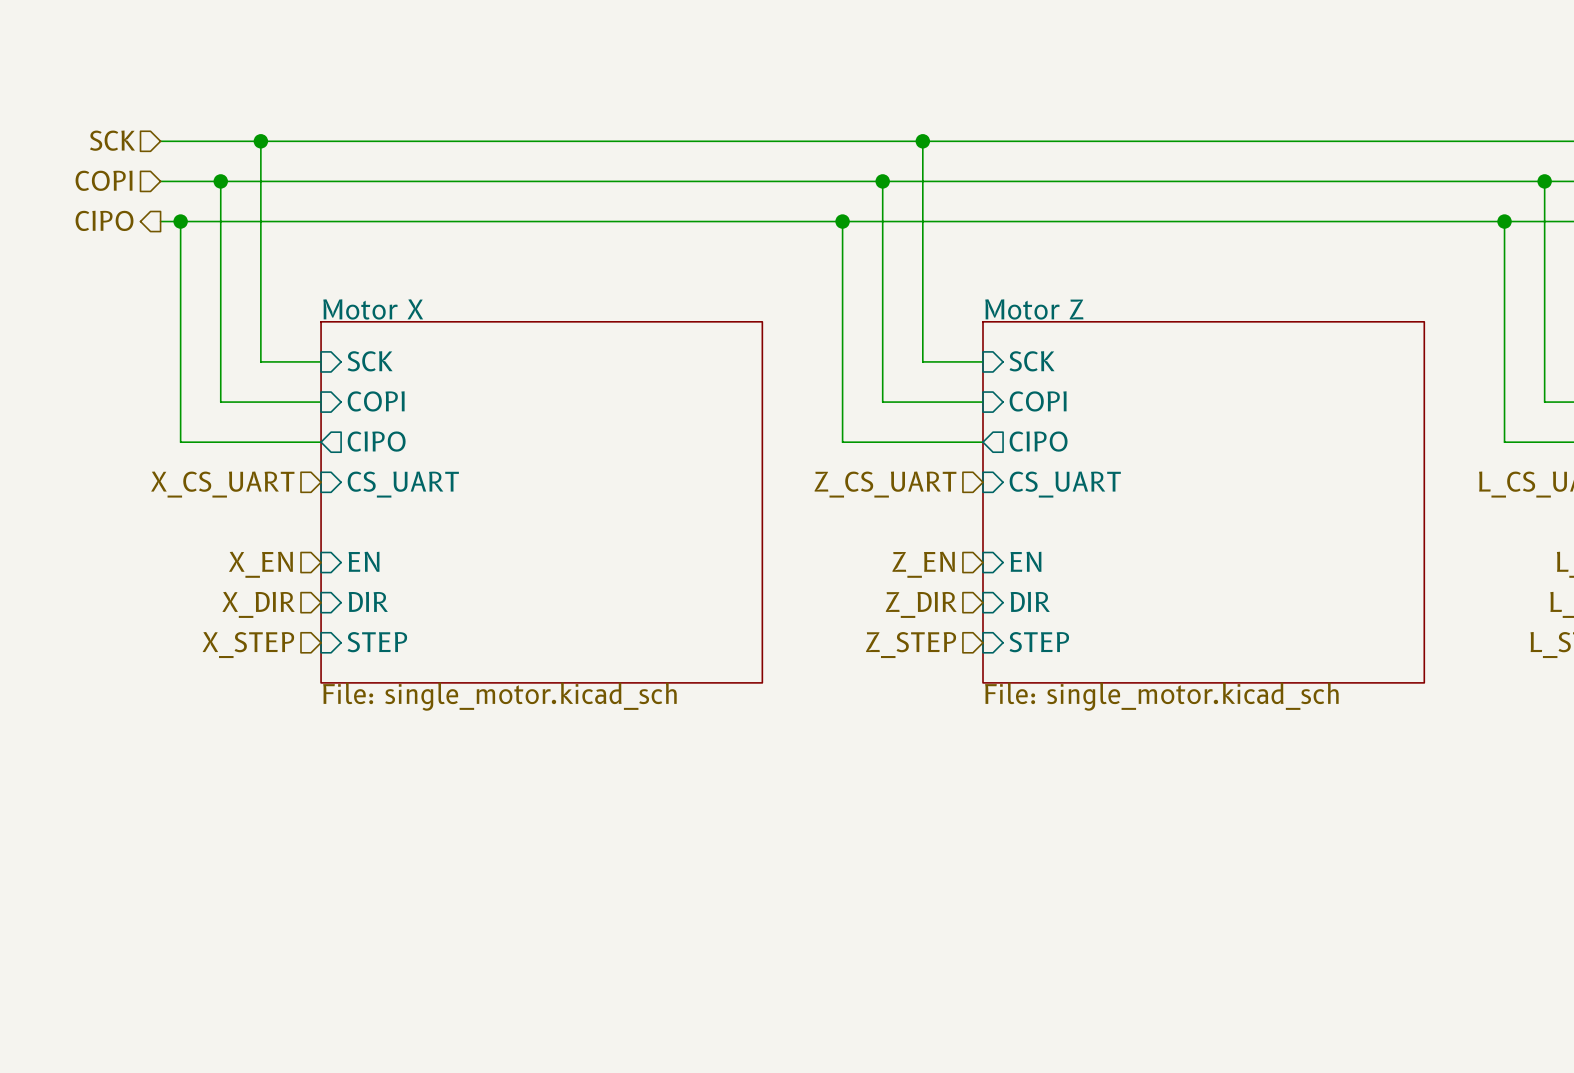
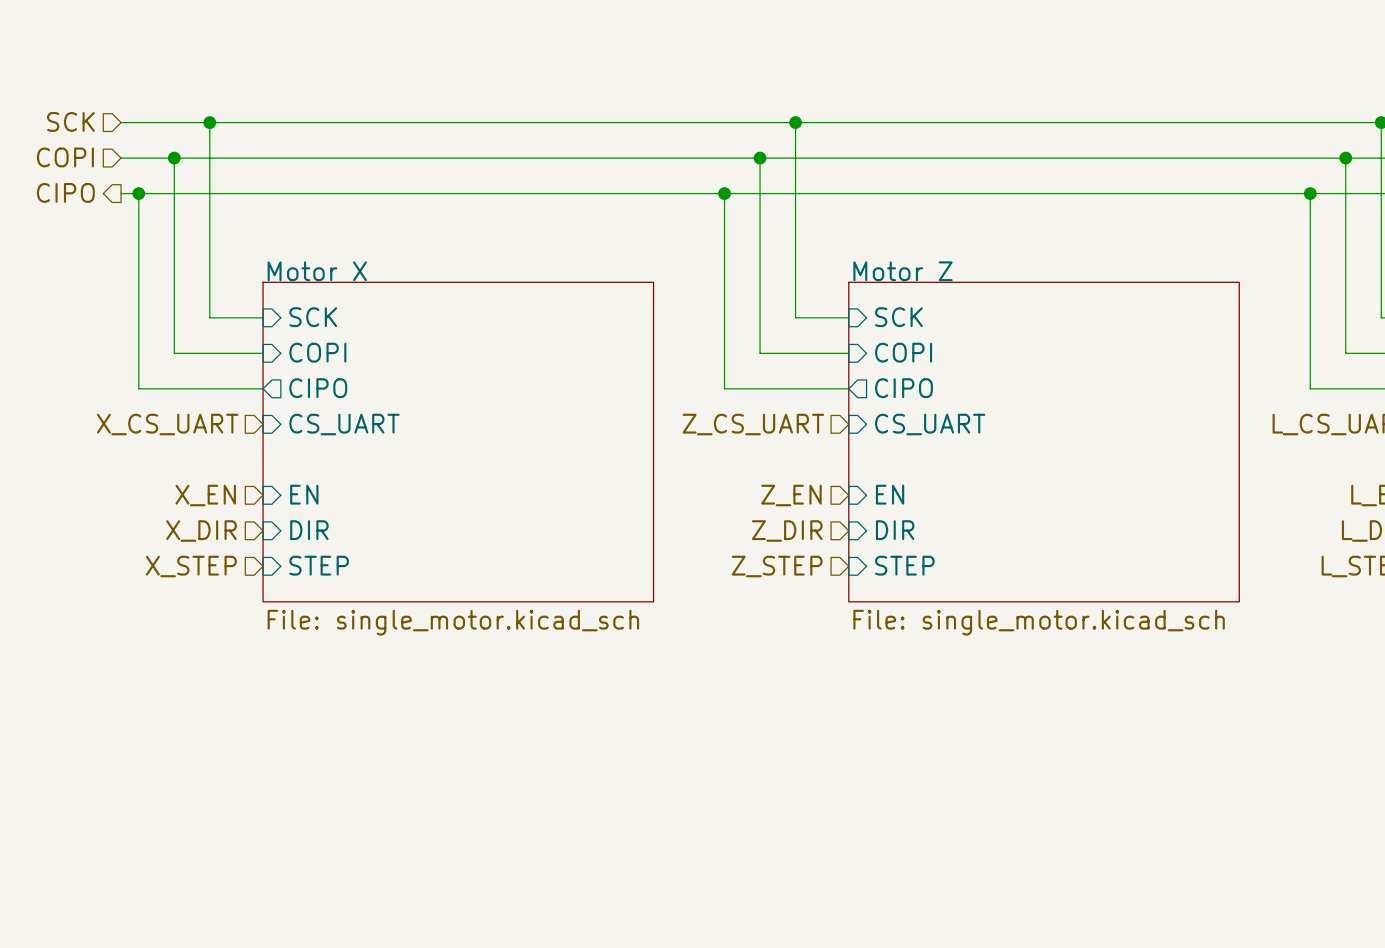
sheet Motor X value position: File: single_motor.kicad_sch (499, 696) -> File: single_motor.kicad_sch (453, 622)
sheet Motor Z value position: File: single_motor.kicad_sch (1161, 696) -> File: single_motor.kicad_sch (1039, 622)

